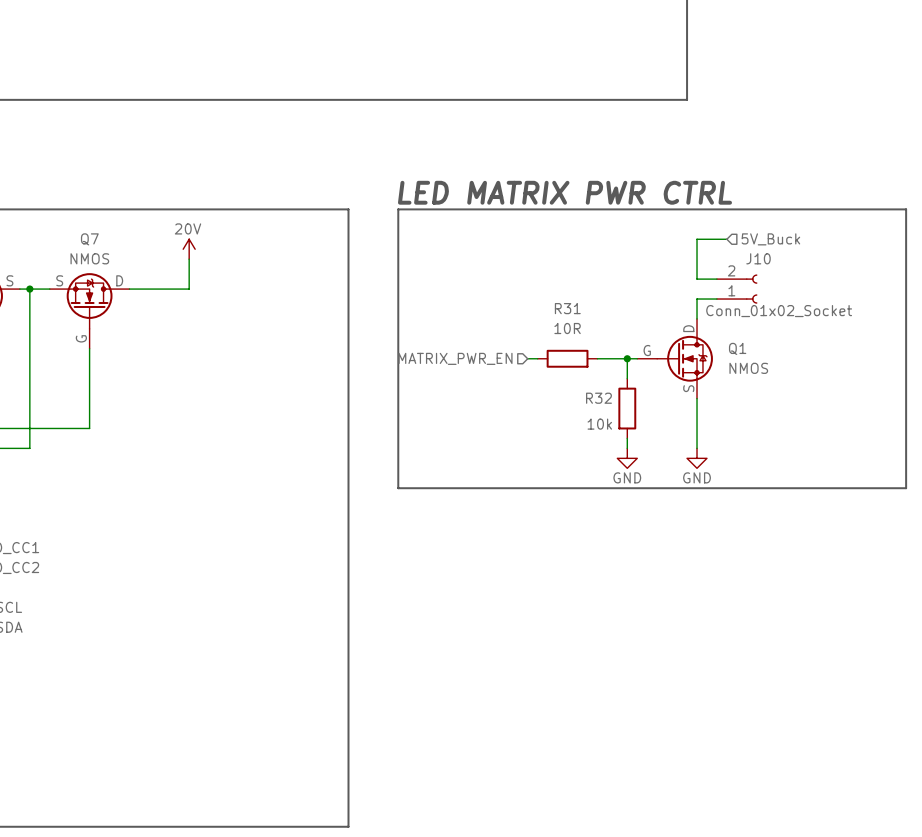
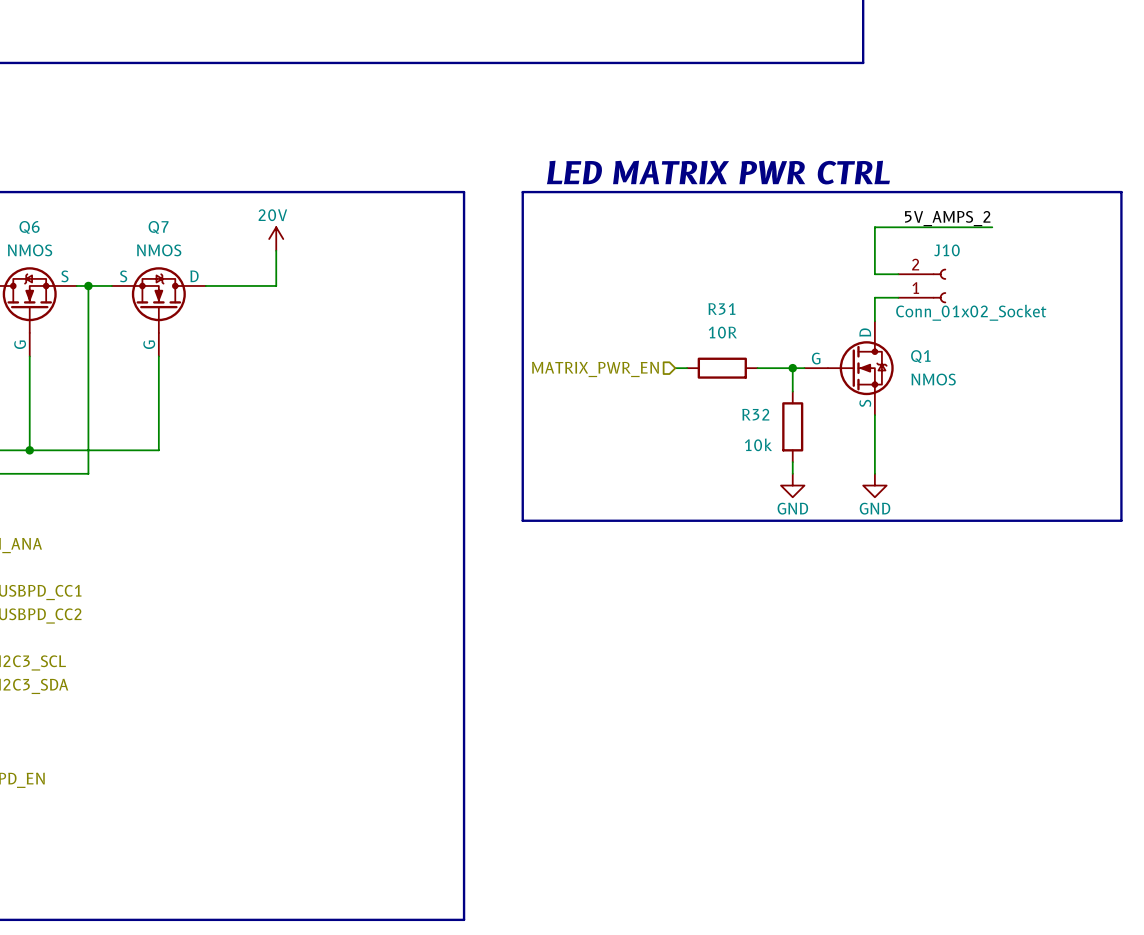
label: none -> 5V_AMPS_2 (947, 218)
wire: none -> (910, 227) (992, 227)
hierarchical label: 5V_Buck (770, 239) -> none

